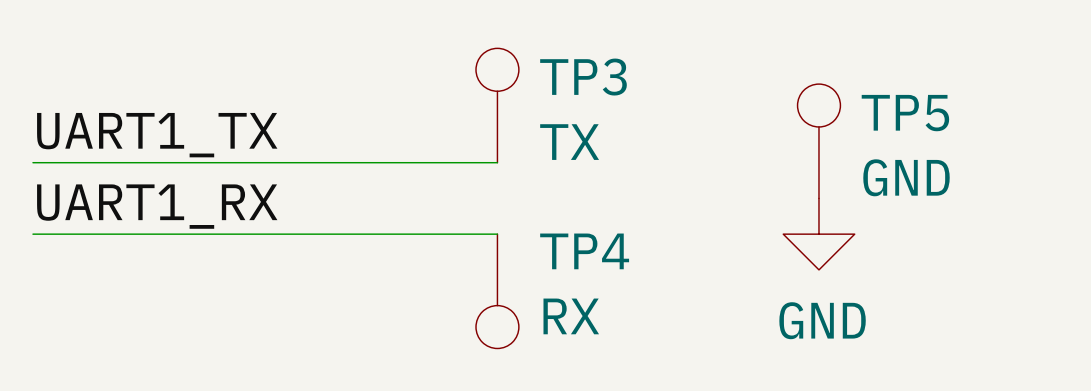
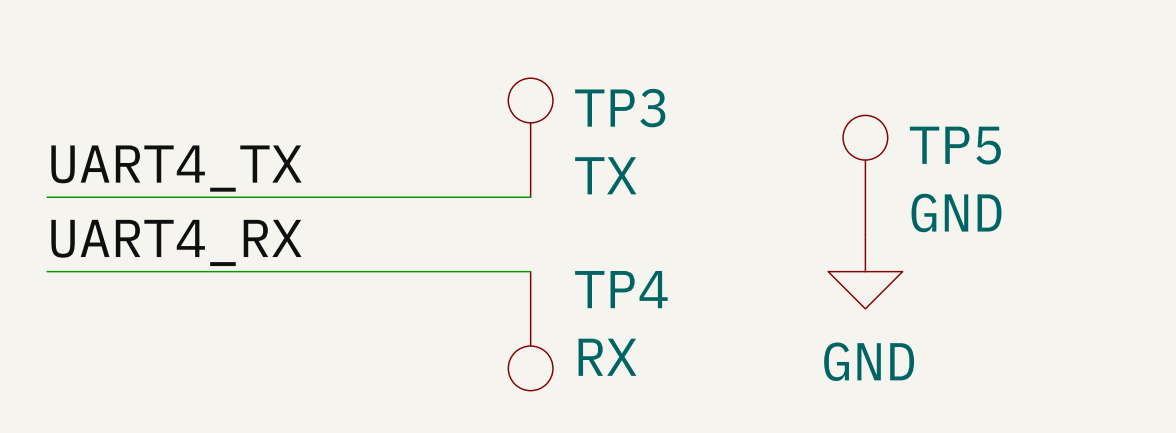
label: UART1_TX (157, 135) -> UART4_TX (176, 168)
label: UART1_RX (157, 206) -> UART4_RX (176, 242)

